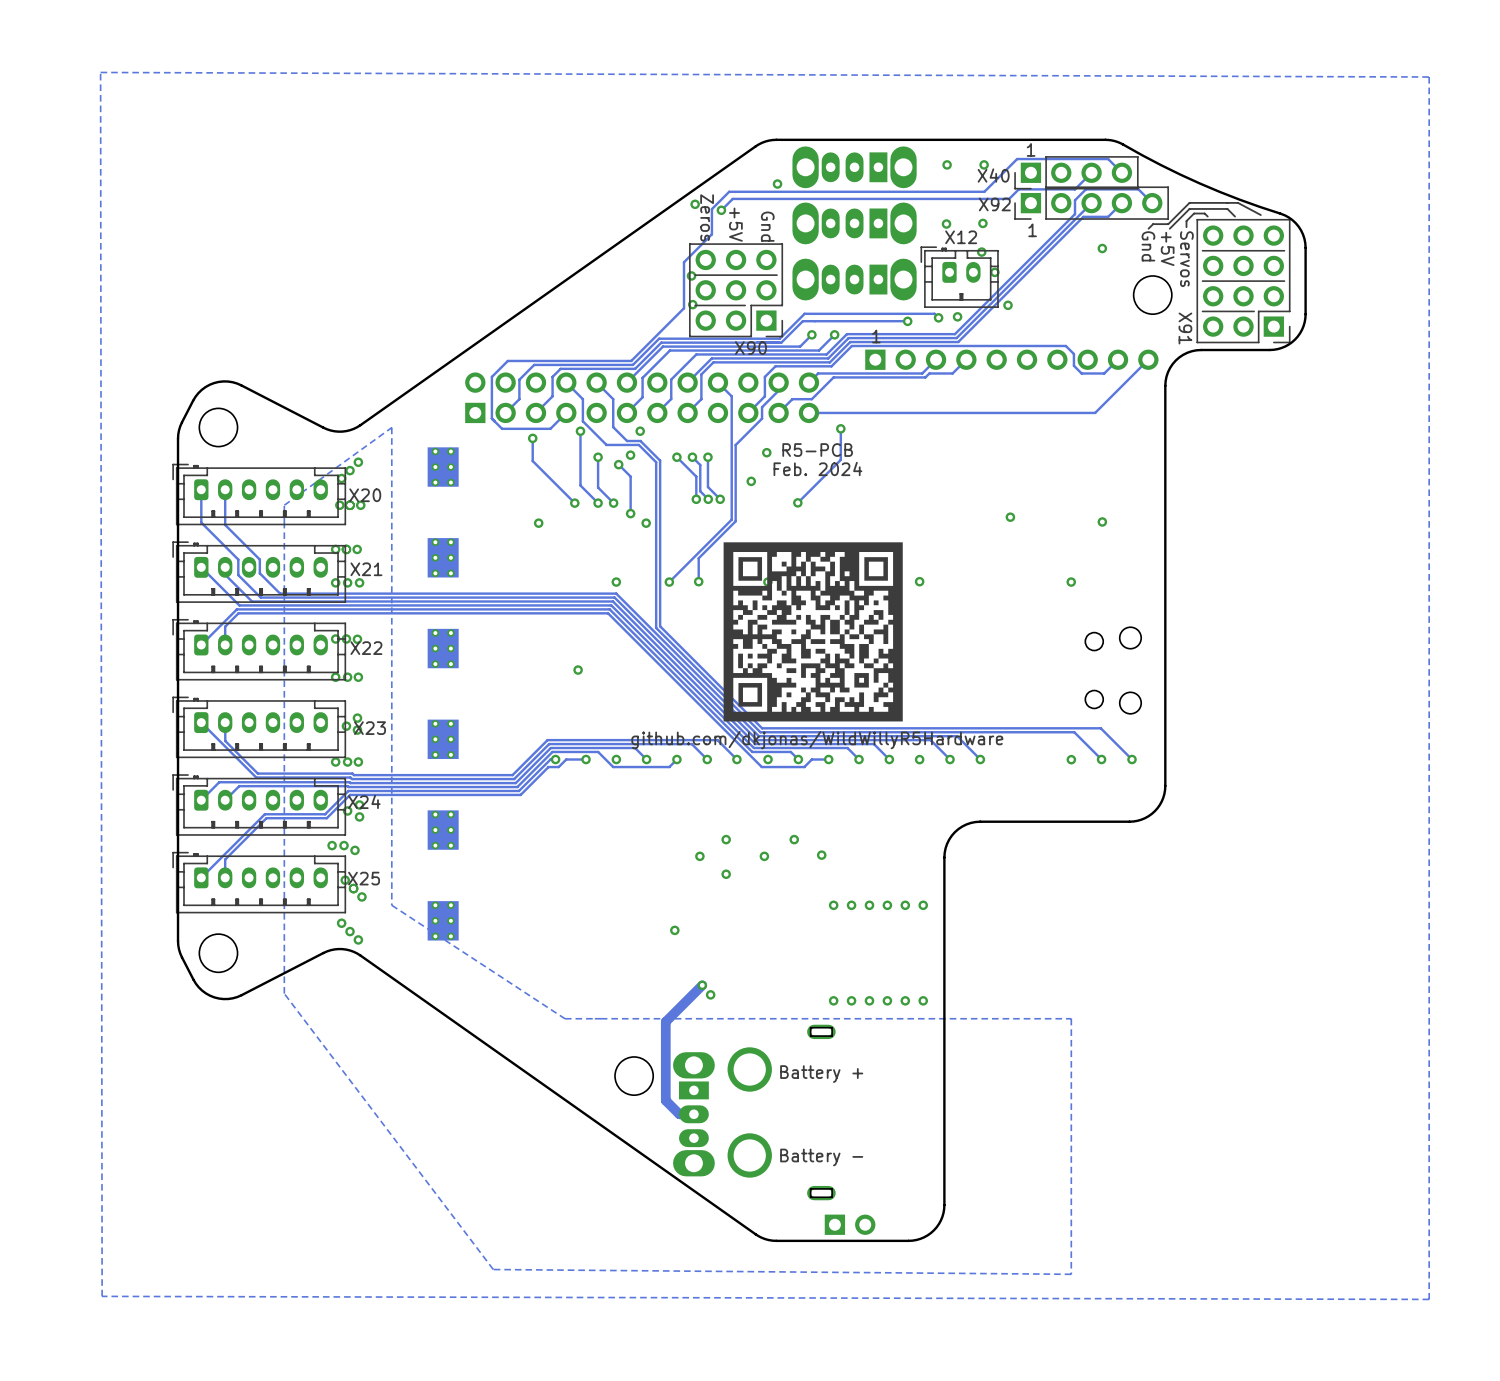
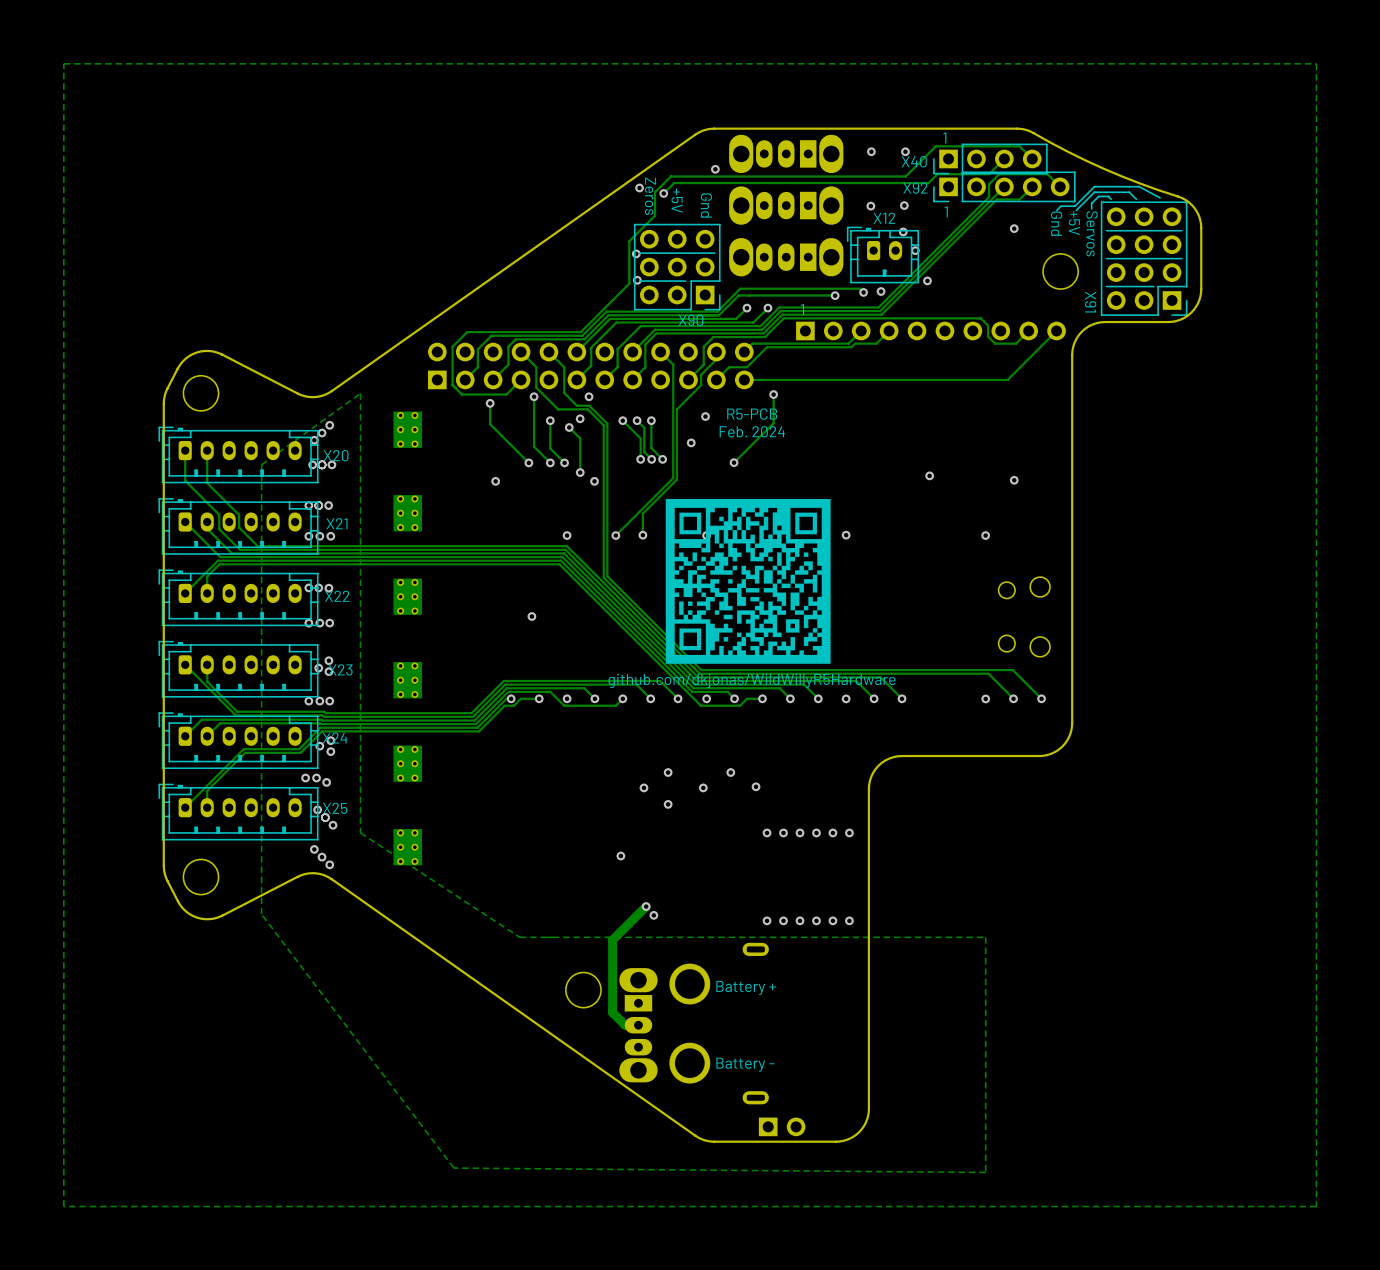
zone outline: (100, 72) (102, 1296) (1429, 1299) (1429, 77) (100, 72) -> (1316, 63) (1316, 1206) (63, 1206) (63, 63) (1316, 63)

